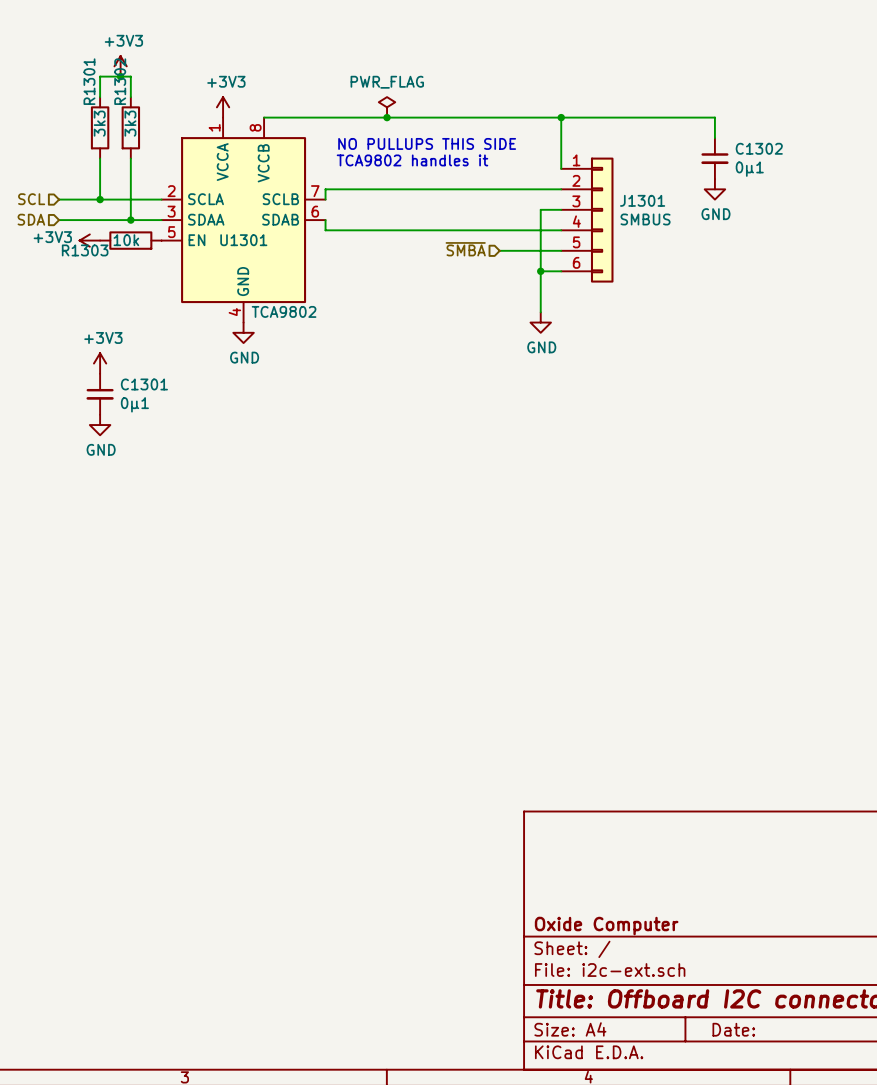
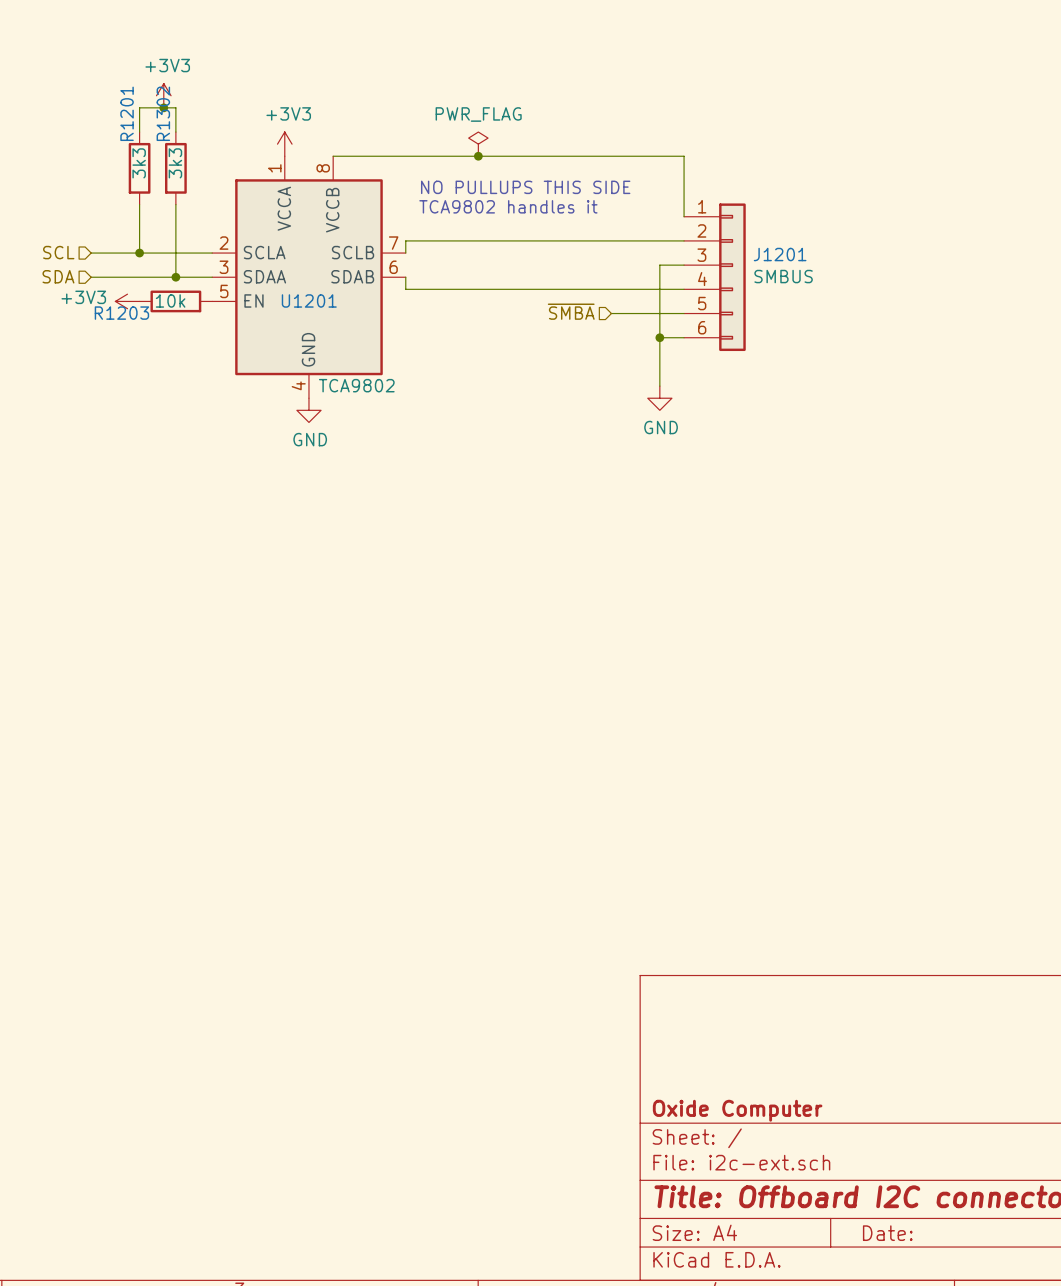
R1301 name: R1301 (89, 81) -> R1201 (127, 113)
wire: (561, 117) (714, 117) (714, 138) -> none
junction: (561, 117) -> none
C1302: 0µ1 (714, 158) -> none
power symbol: GND (714, 189) -> none
J1301 name: J1301 (642, 200) -> J1201 (780, 254)
U1301 name: U1301 (243, 240) -> U1201 (309, 300)
R1303 name: R1303 (85, 250) -> R1203 (121, 313)
power symbol: +3V3 (100, 363) -> none
C1301: 0µ1 (100, 394) -> none
power symbol: GND (100, 425) -> none

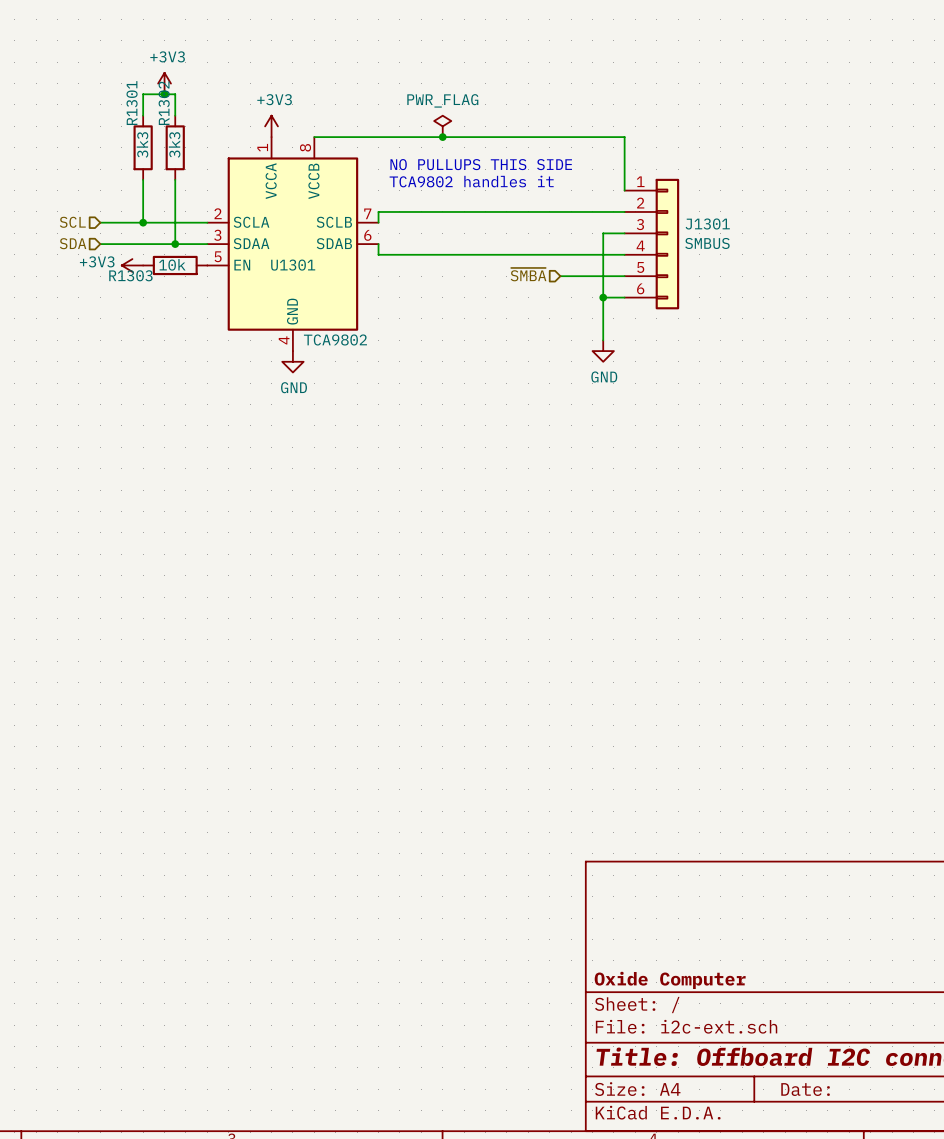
R1201 name: R1201 (127, 113) -> R1301 (132, 103)
J1201 name: J1201 (780, 254) -> J1301 (707, 224)
U1201 name: U1201 (309, 300) -> U1301 (293, 265)
R1203 name: R1203 (121, 313) -> R1303 (130, 275)

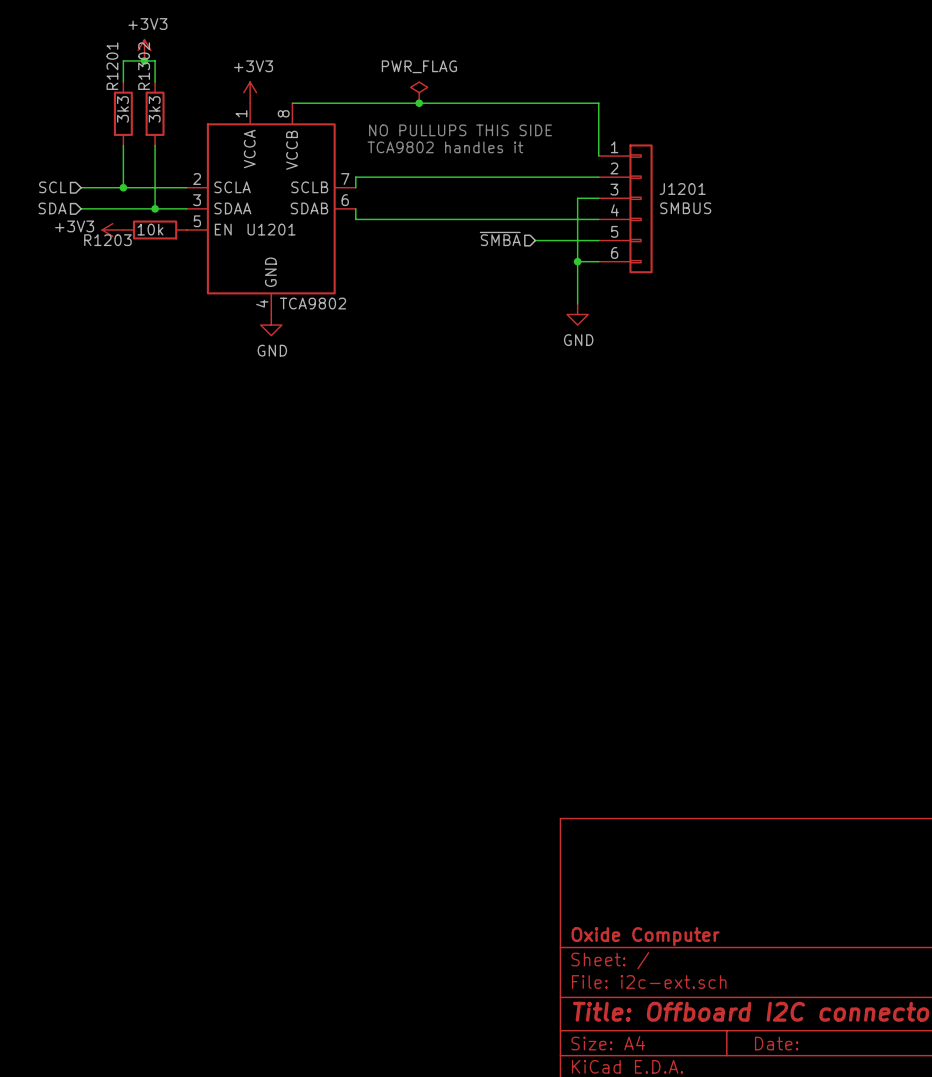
R1301 name: R1301 (132, 103) -> R1201 (112, 66)
J1301 name: J1301 (707, 224) -> J1201 (682, 189)
U1301 name: U1301 (293, 265) -> U1201 (271, 229)
R1303 name: R1303 (130, 275) -> R1203 (107, 240)

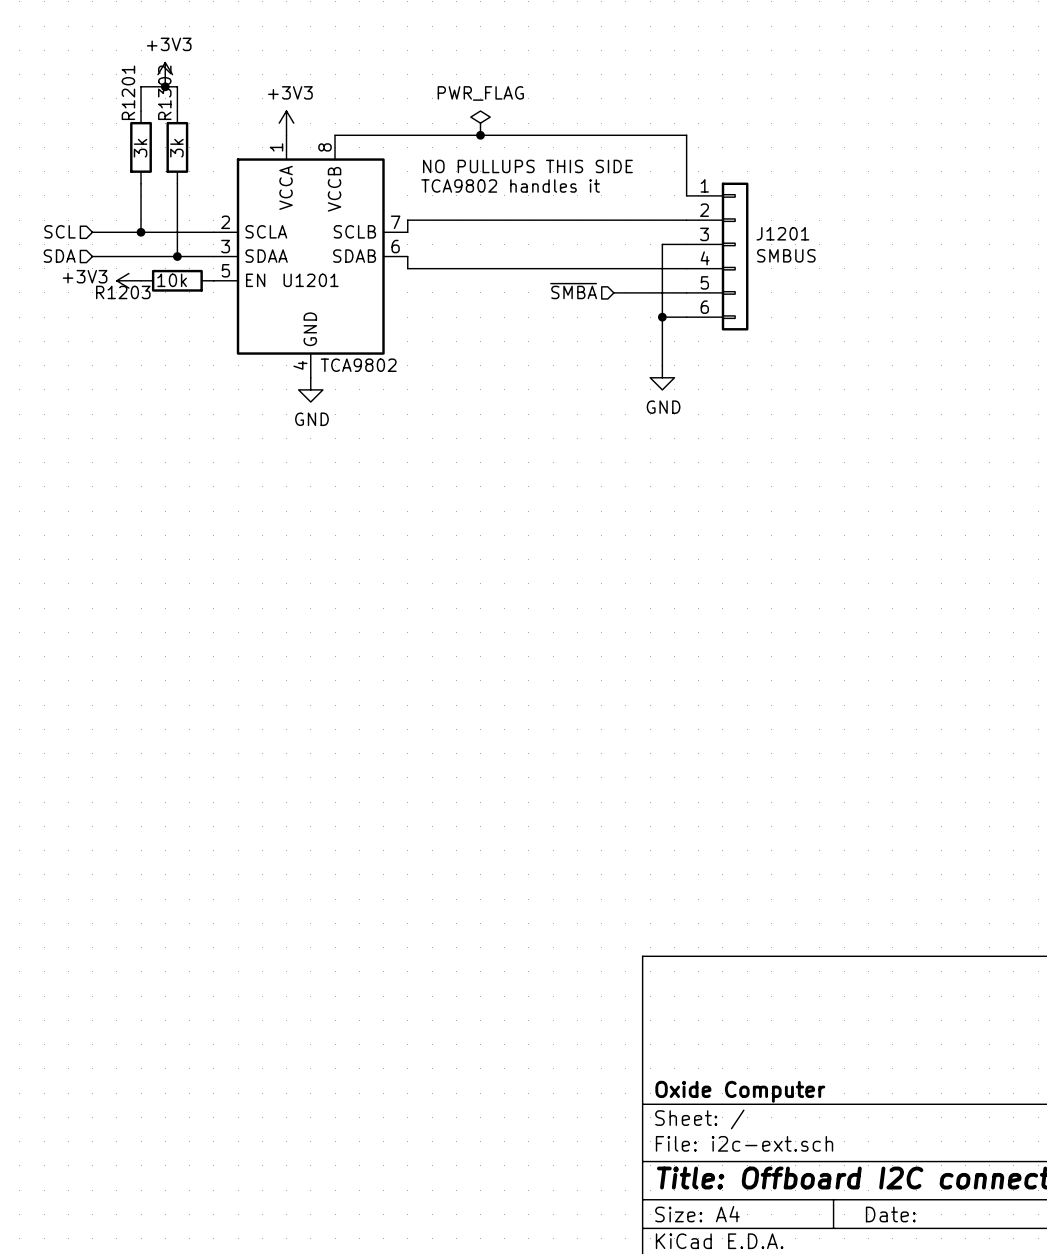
R1201 value: 3k3 (122, 109) -> 3k (140, 148)
R1302 value: 3k3 (154, 109) -> 3k (176, 148)

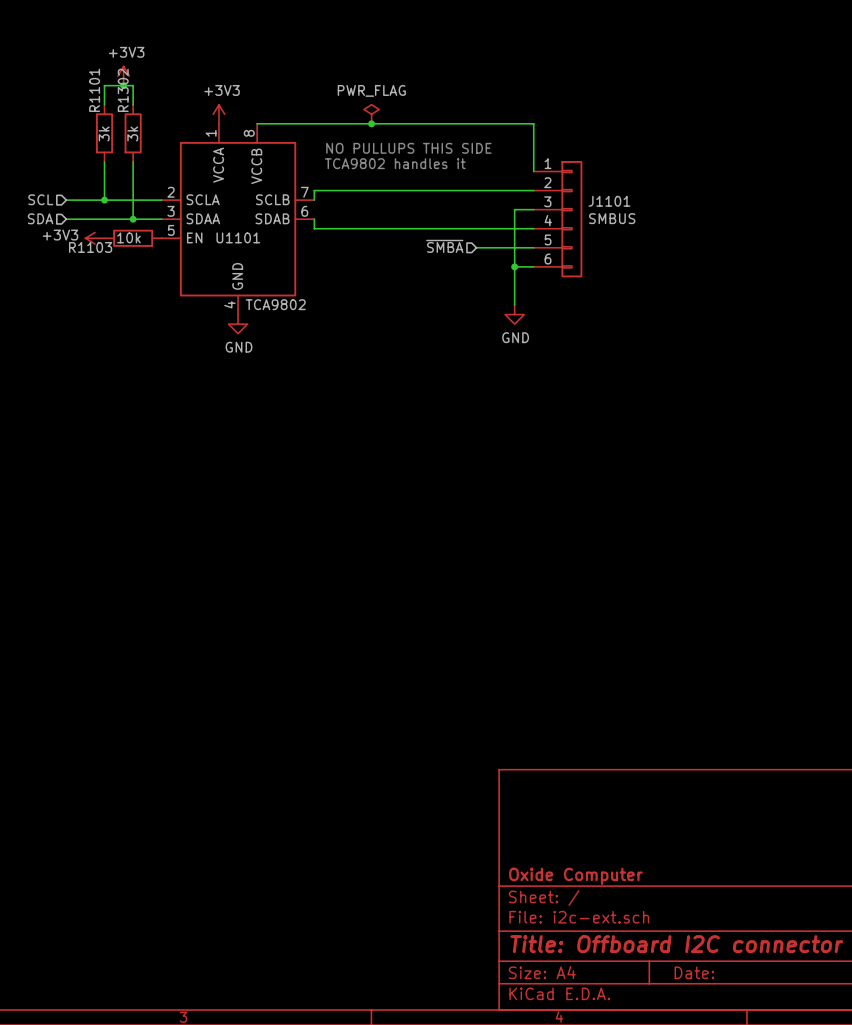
R1201 name: R1201 (128, 92) -> R1101 (94, 90)
J1201 name: J1201 (782, 233) -> J1101 (609, 201)
U1201 name: U1201 (311, 280) -> U1101 (238, 237)
R1203 name: R1203 (123, 292) -> R1103 (90, 247)

